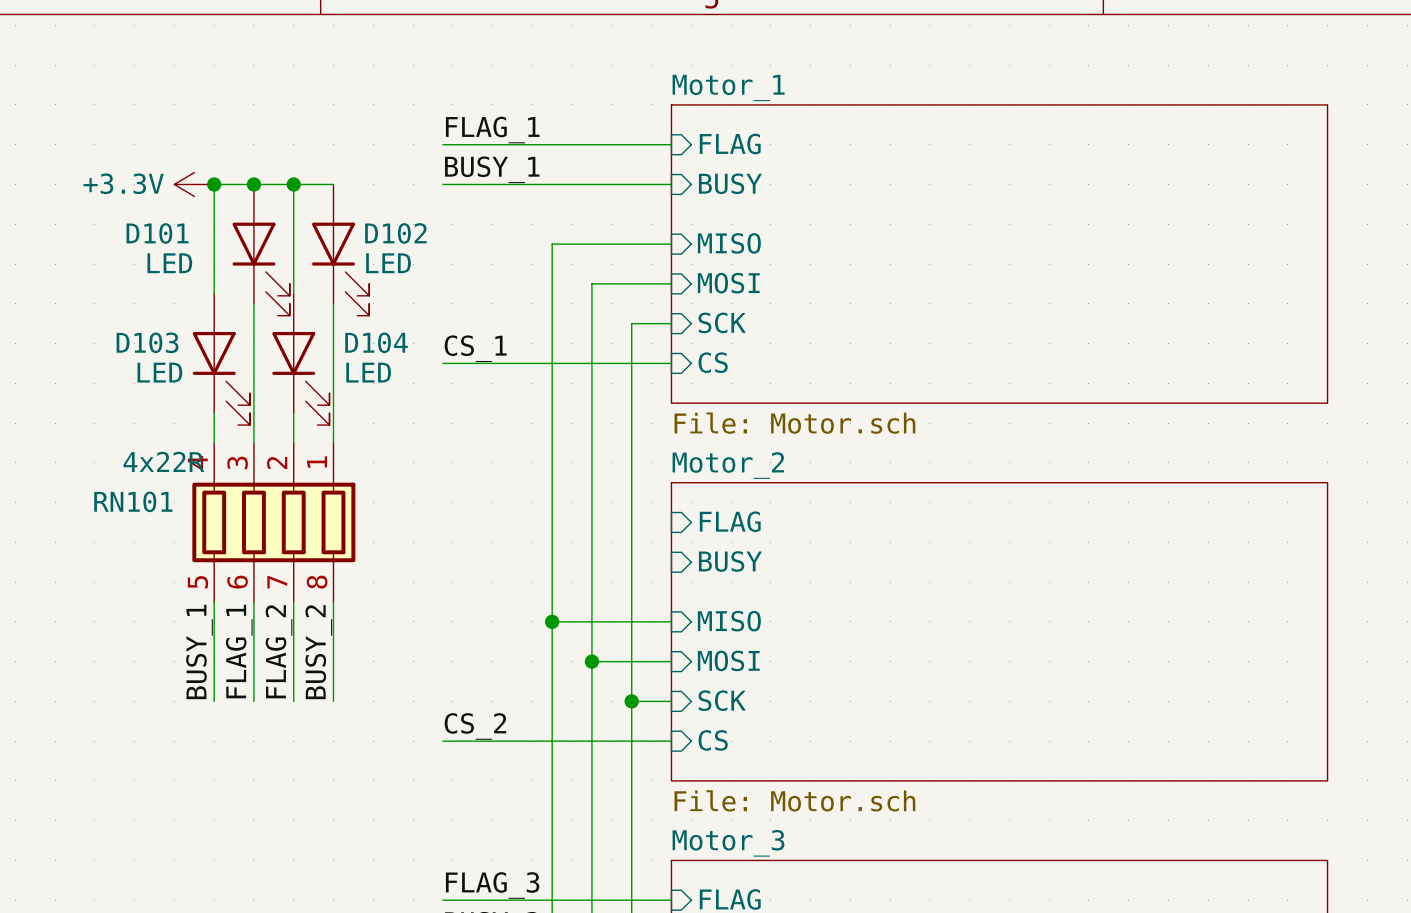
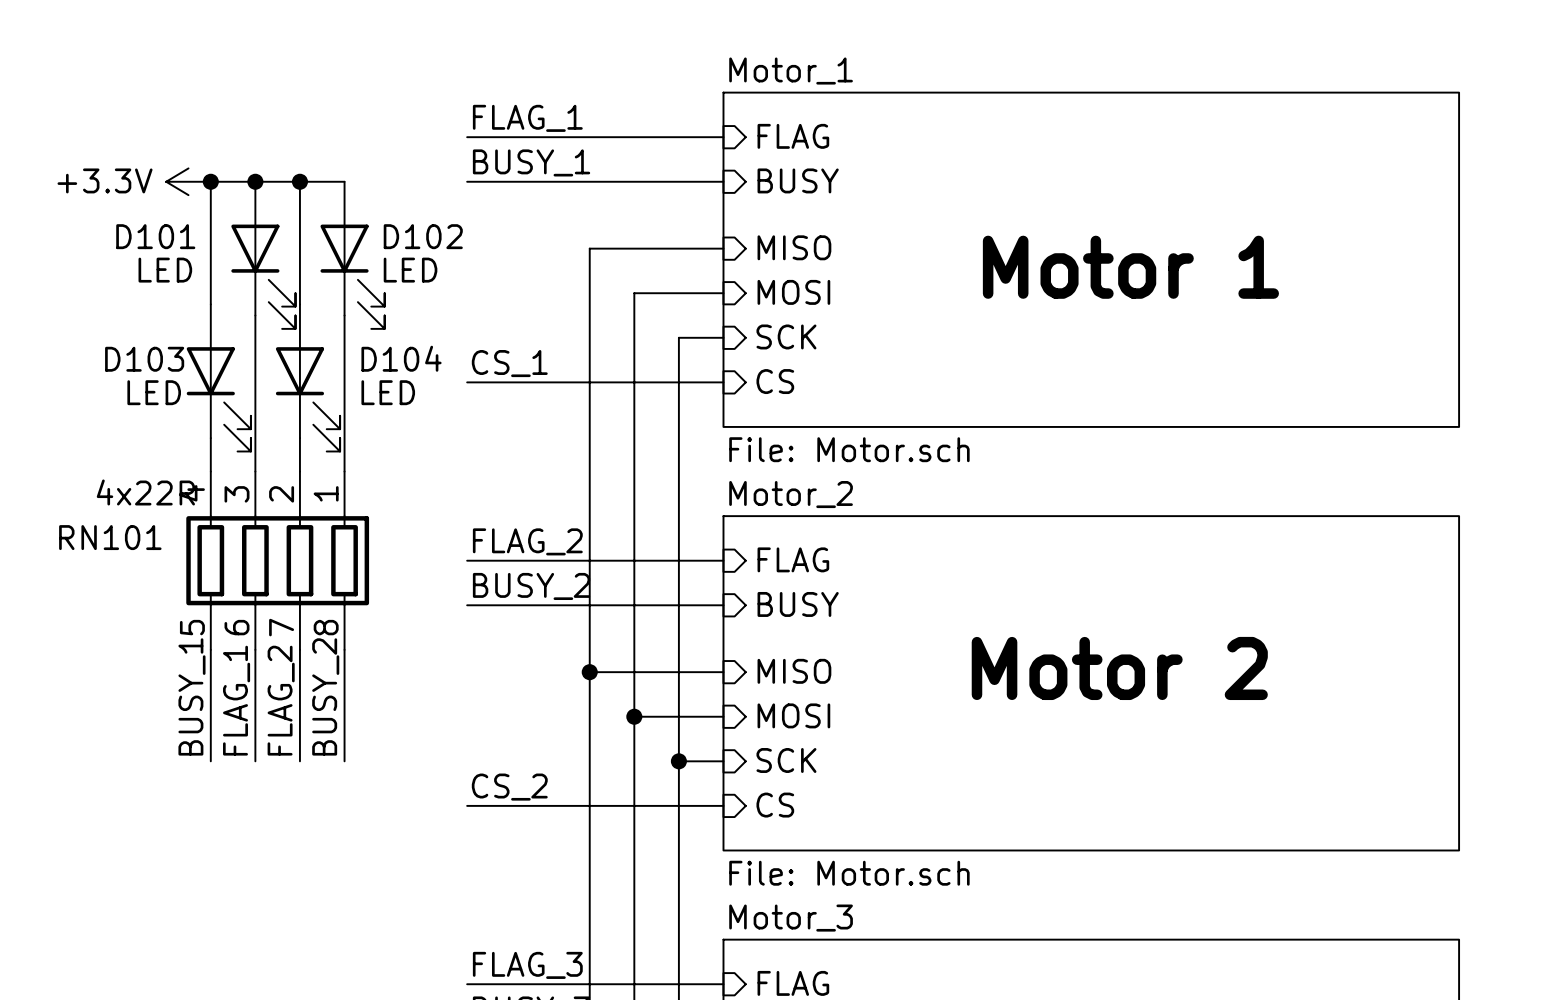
text: none -> Motor 1 (1130, 267)
label: none -> FLAG_2 (527, 541)
wire: none -> (467, 560) (723, 560)
label: none -> BUSY_2 (531, 586)
wire: none -> (467, 605) (723, 605)
text: none -> Motor 2 (1119, 668)

